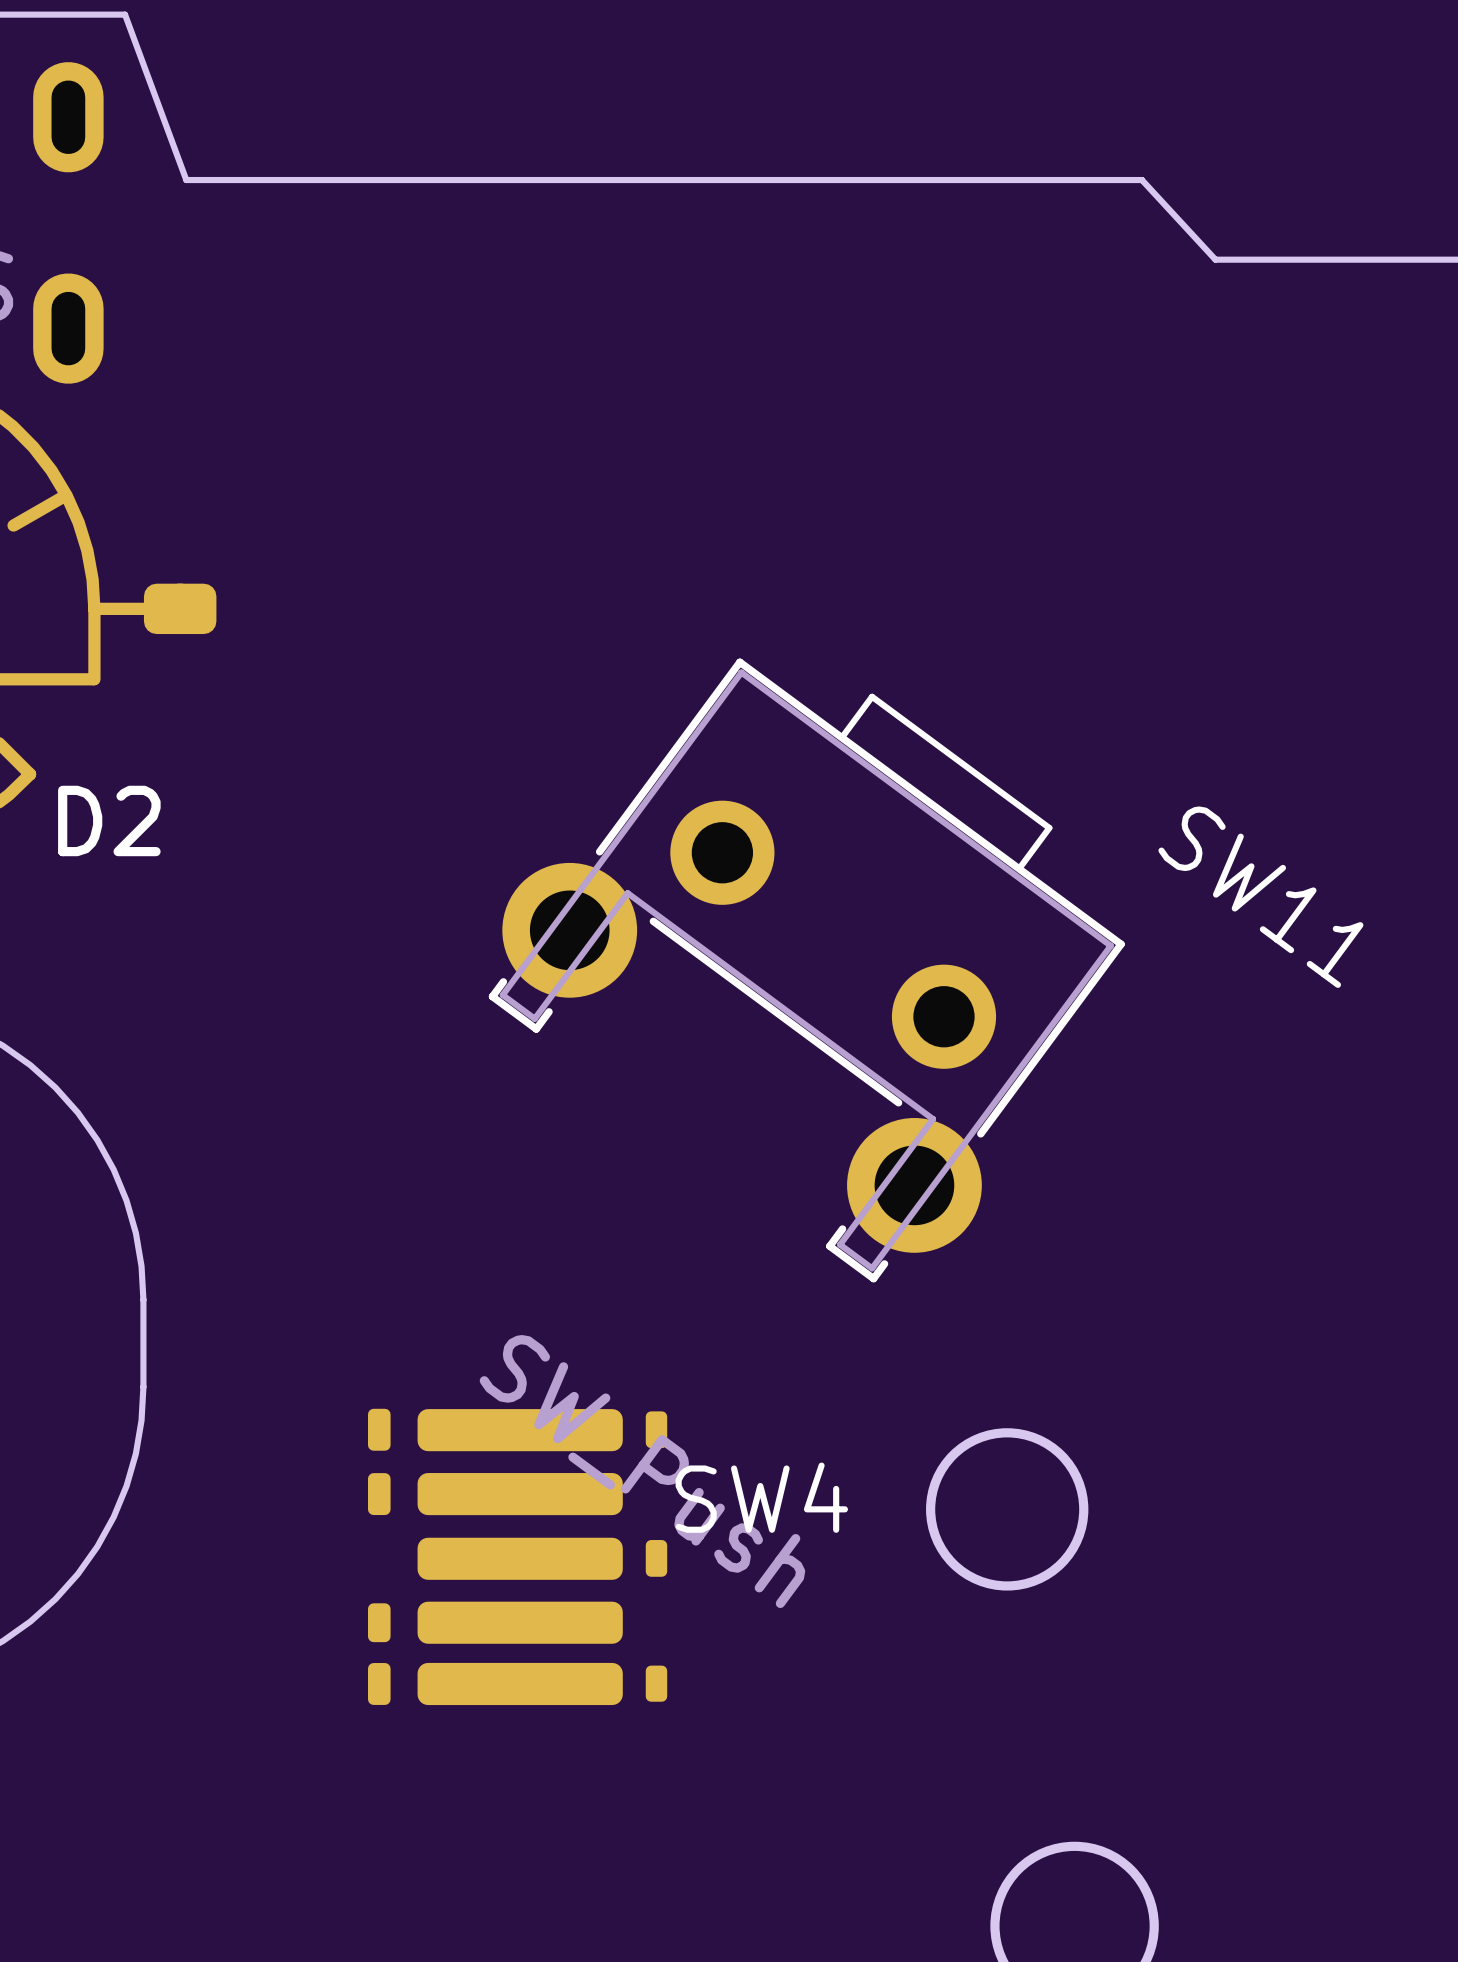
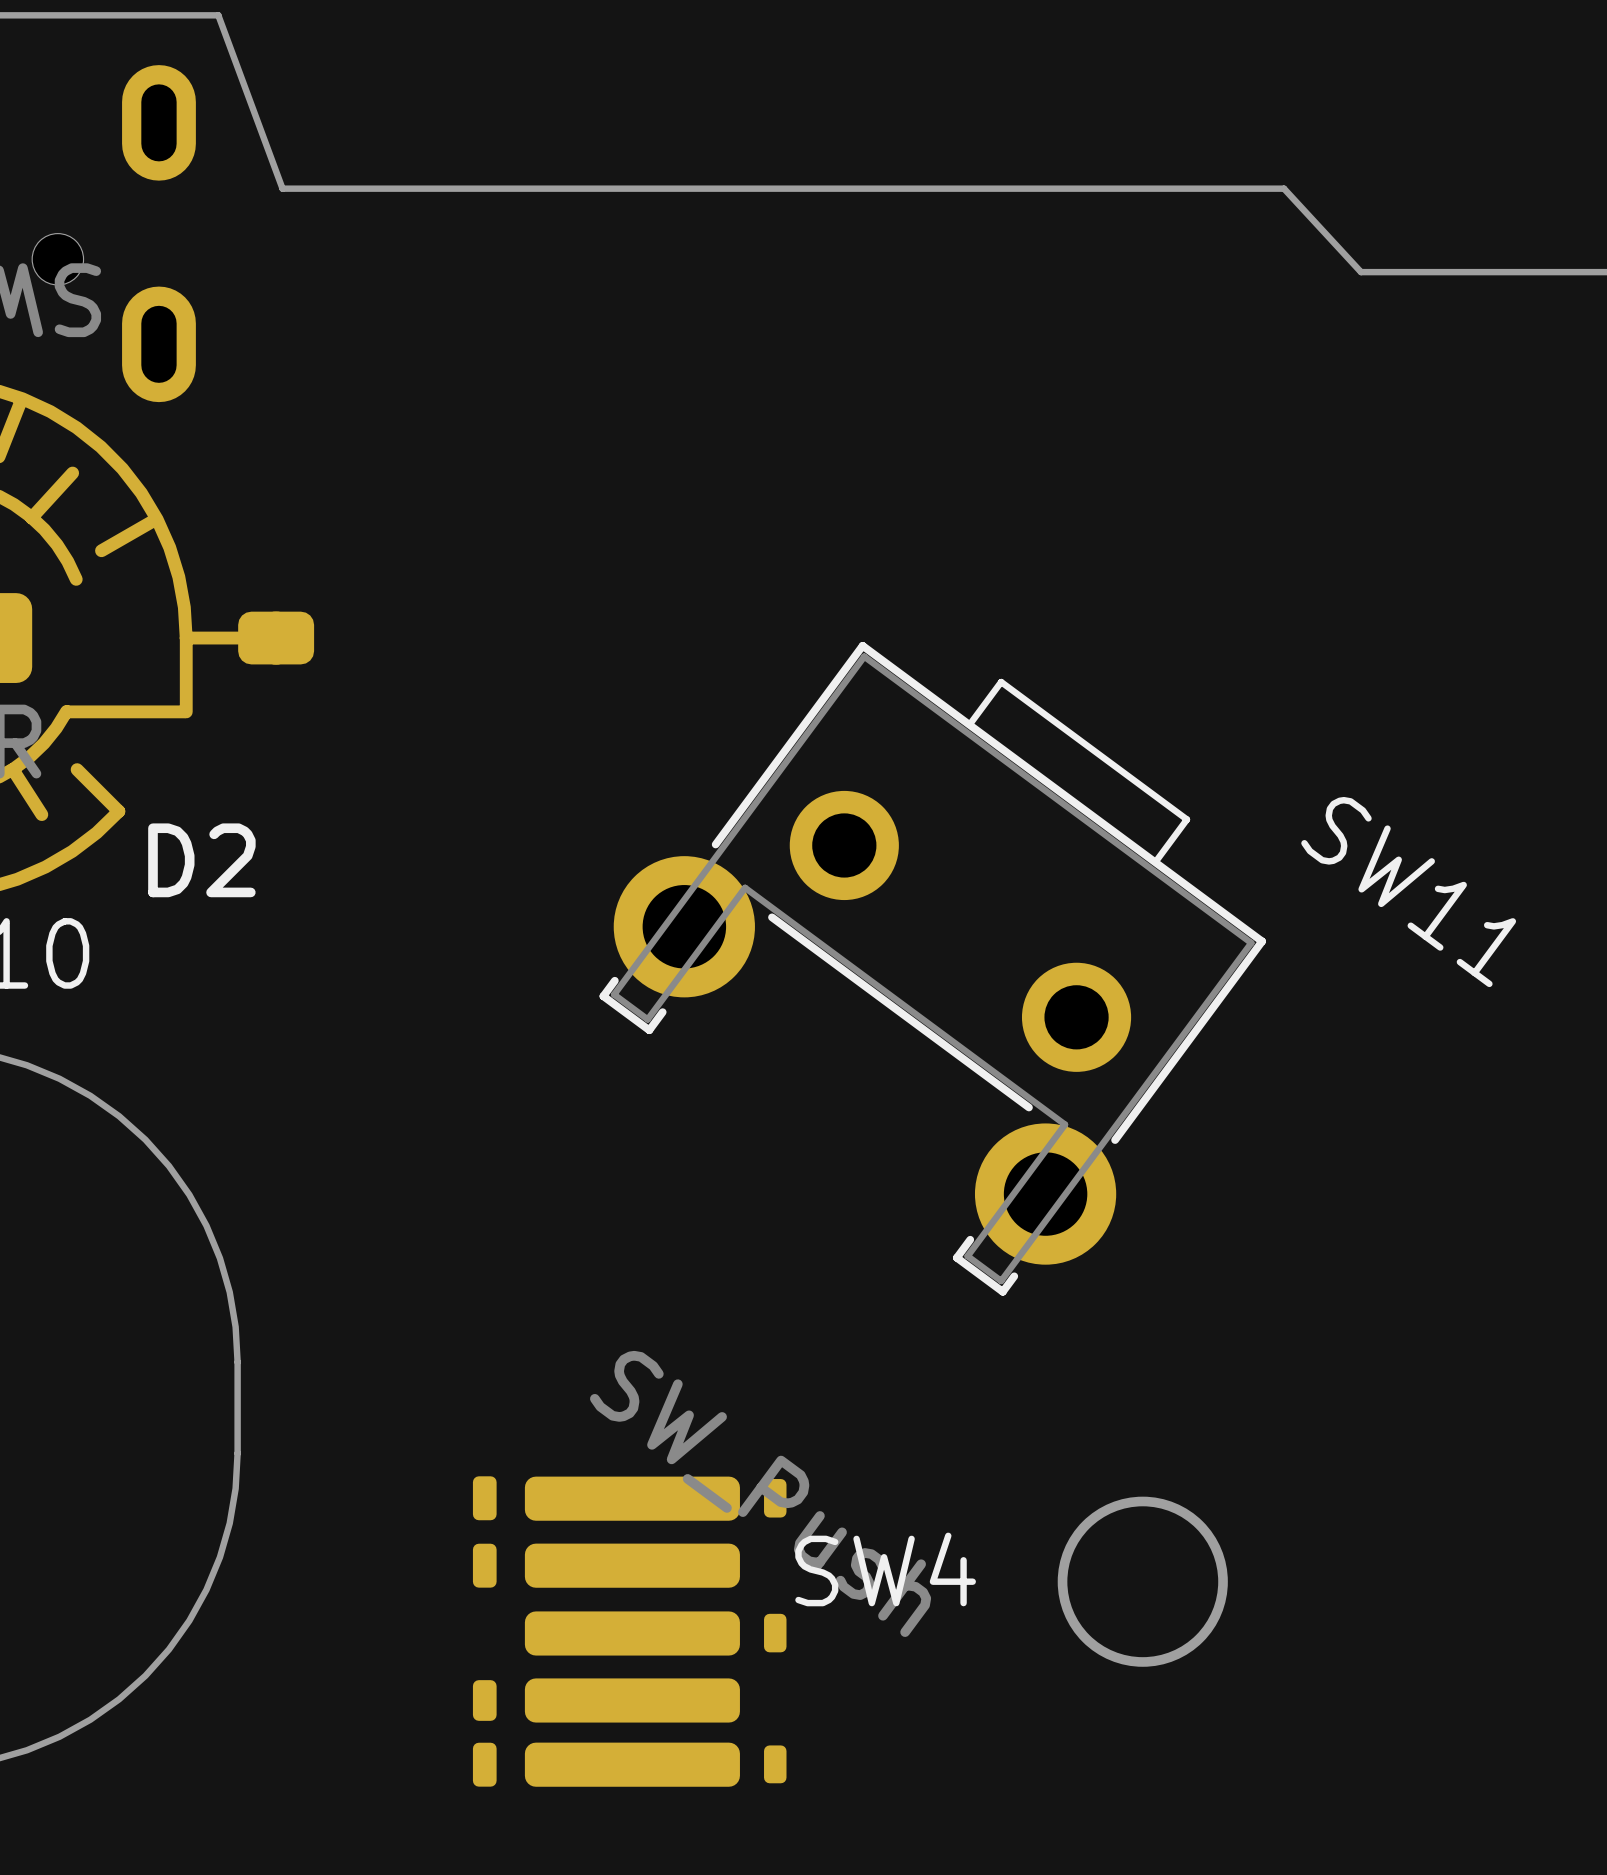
SW11 position: (806, 970) -> (932, 968)

